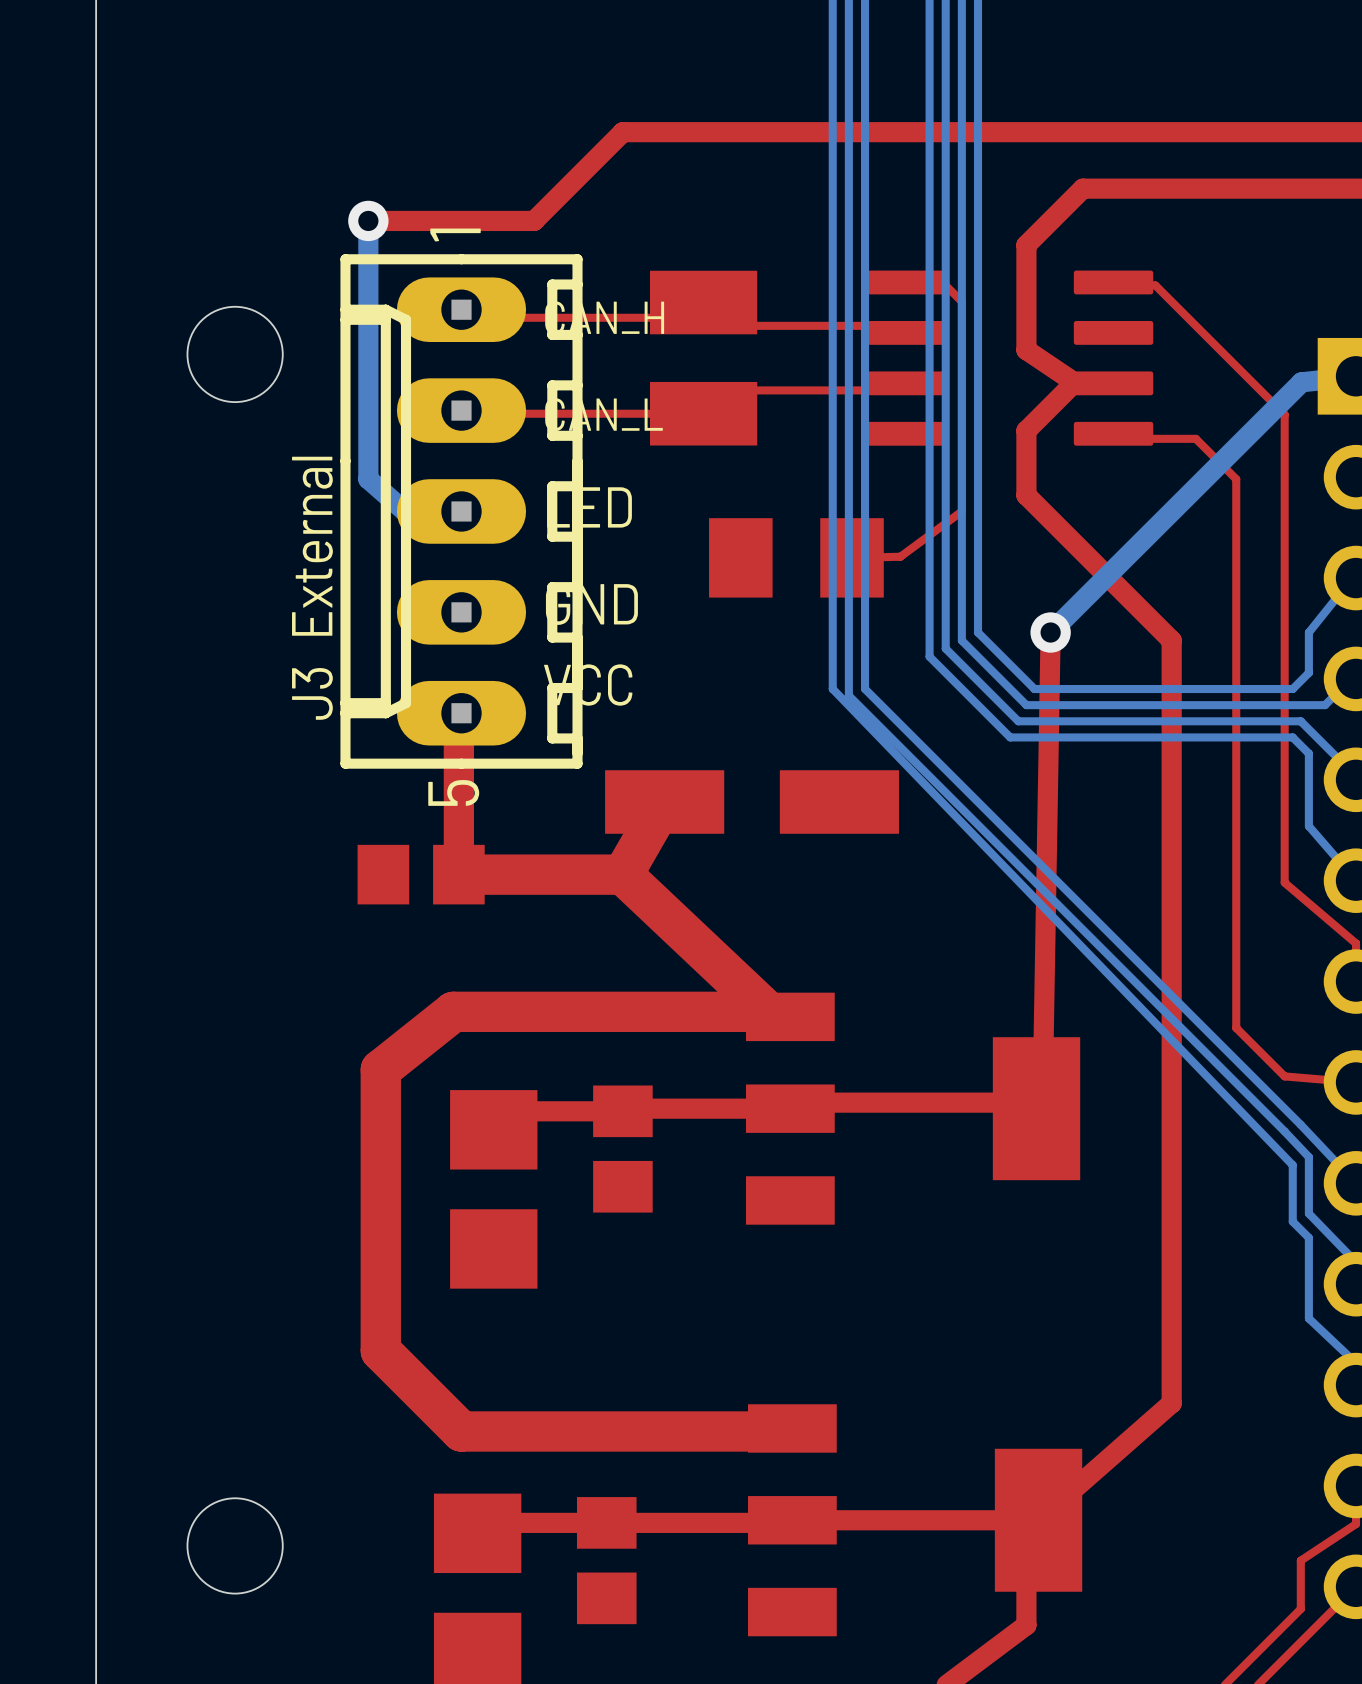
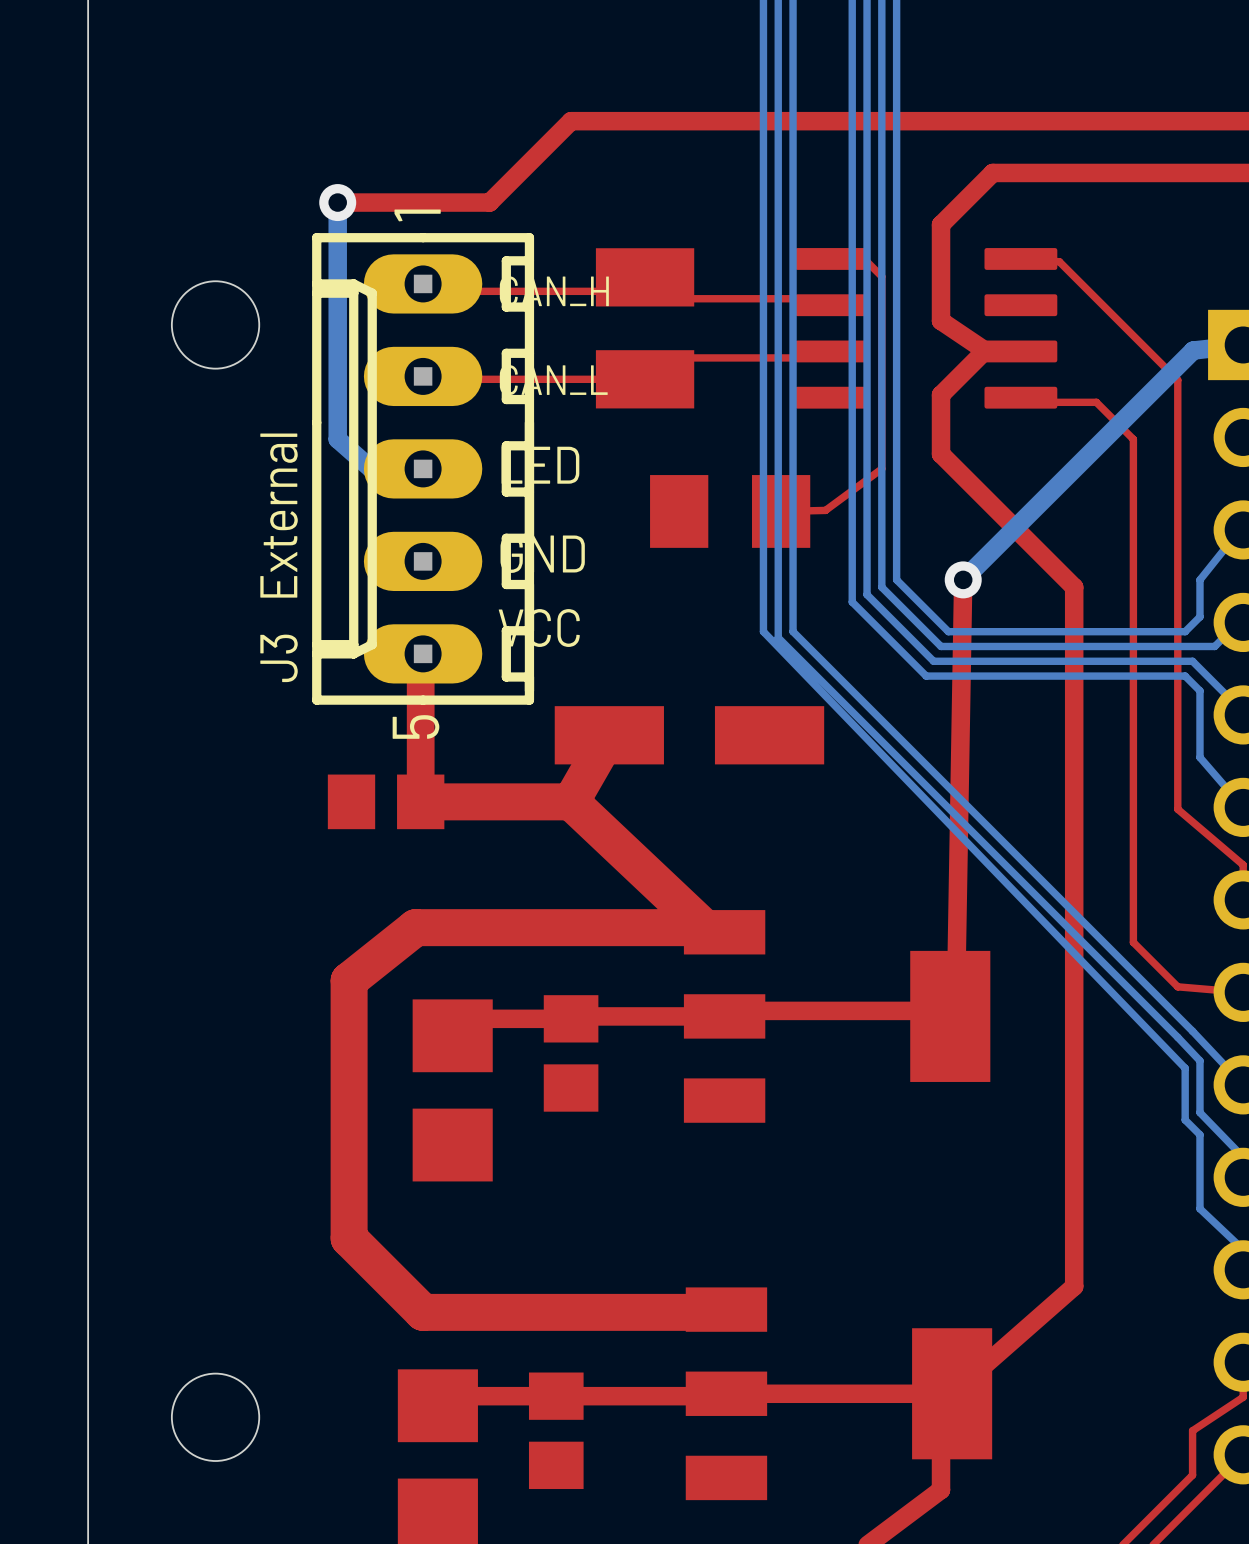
J3 value position: External (312, 546) -> External (279, 515)
J3 name position: J3 (312, 693) -> J3 (279, 658)

